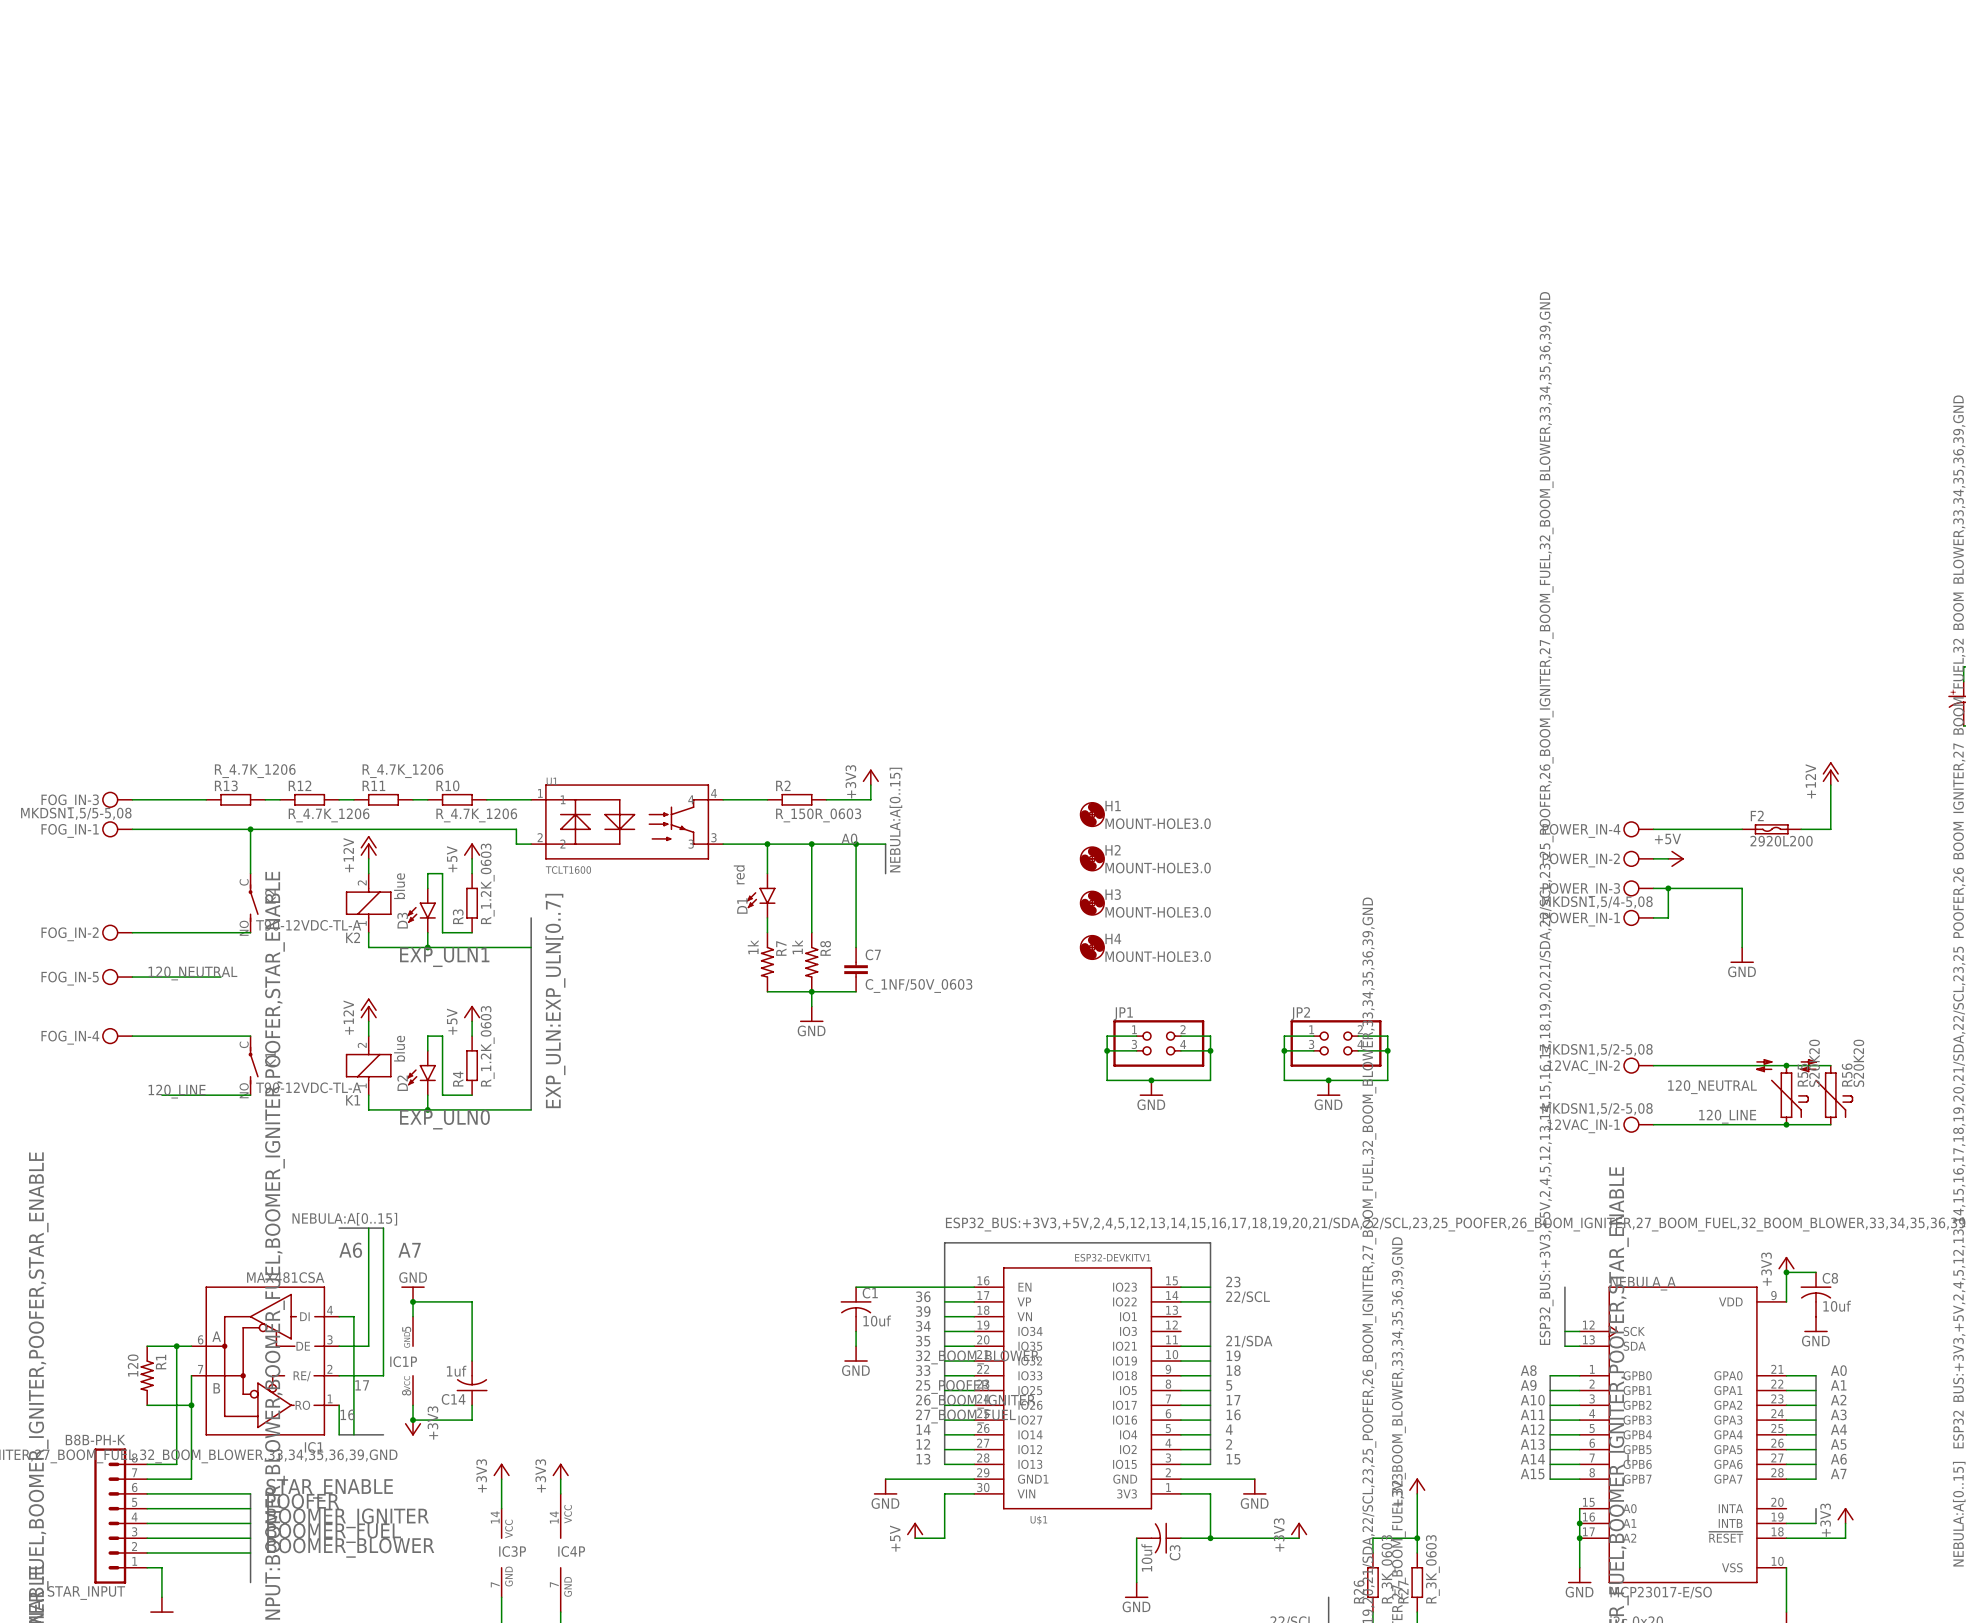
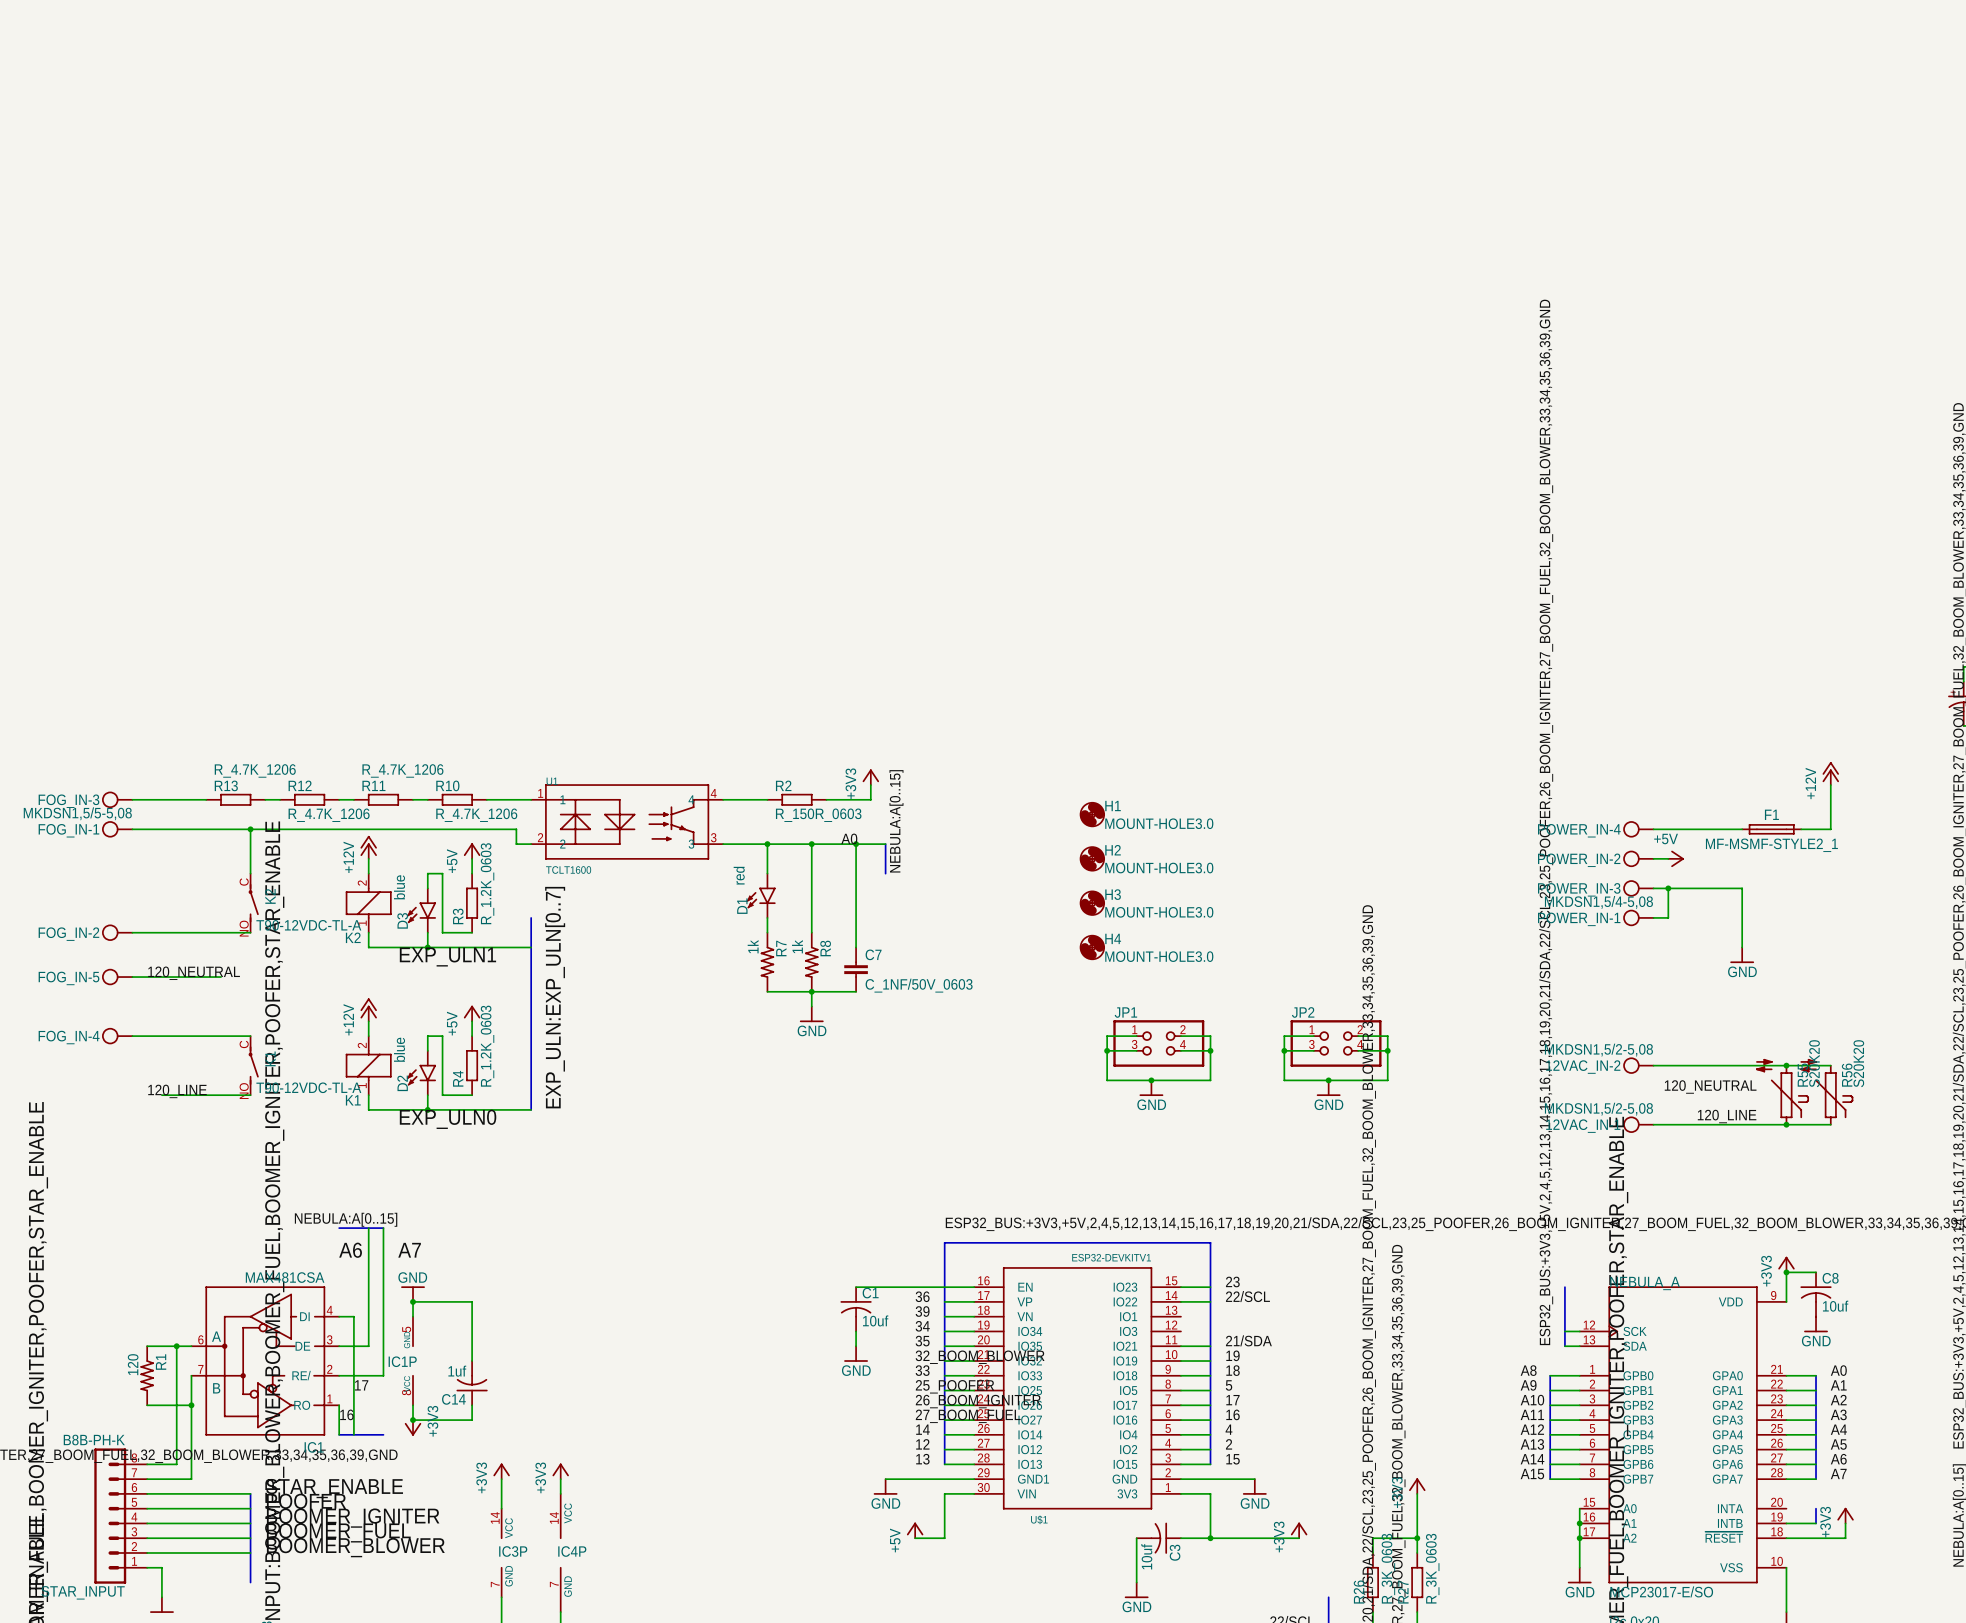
F2: 2920L200 (1771, 829) -> none
F1: none -> MF-MSMF-STYLE2_1 (1771, 829)

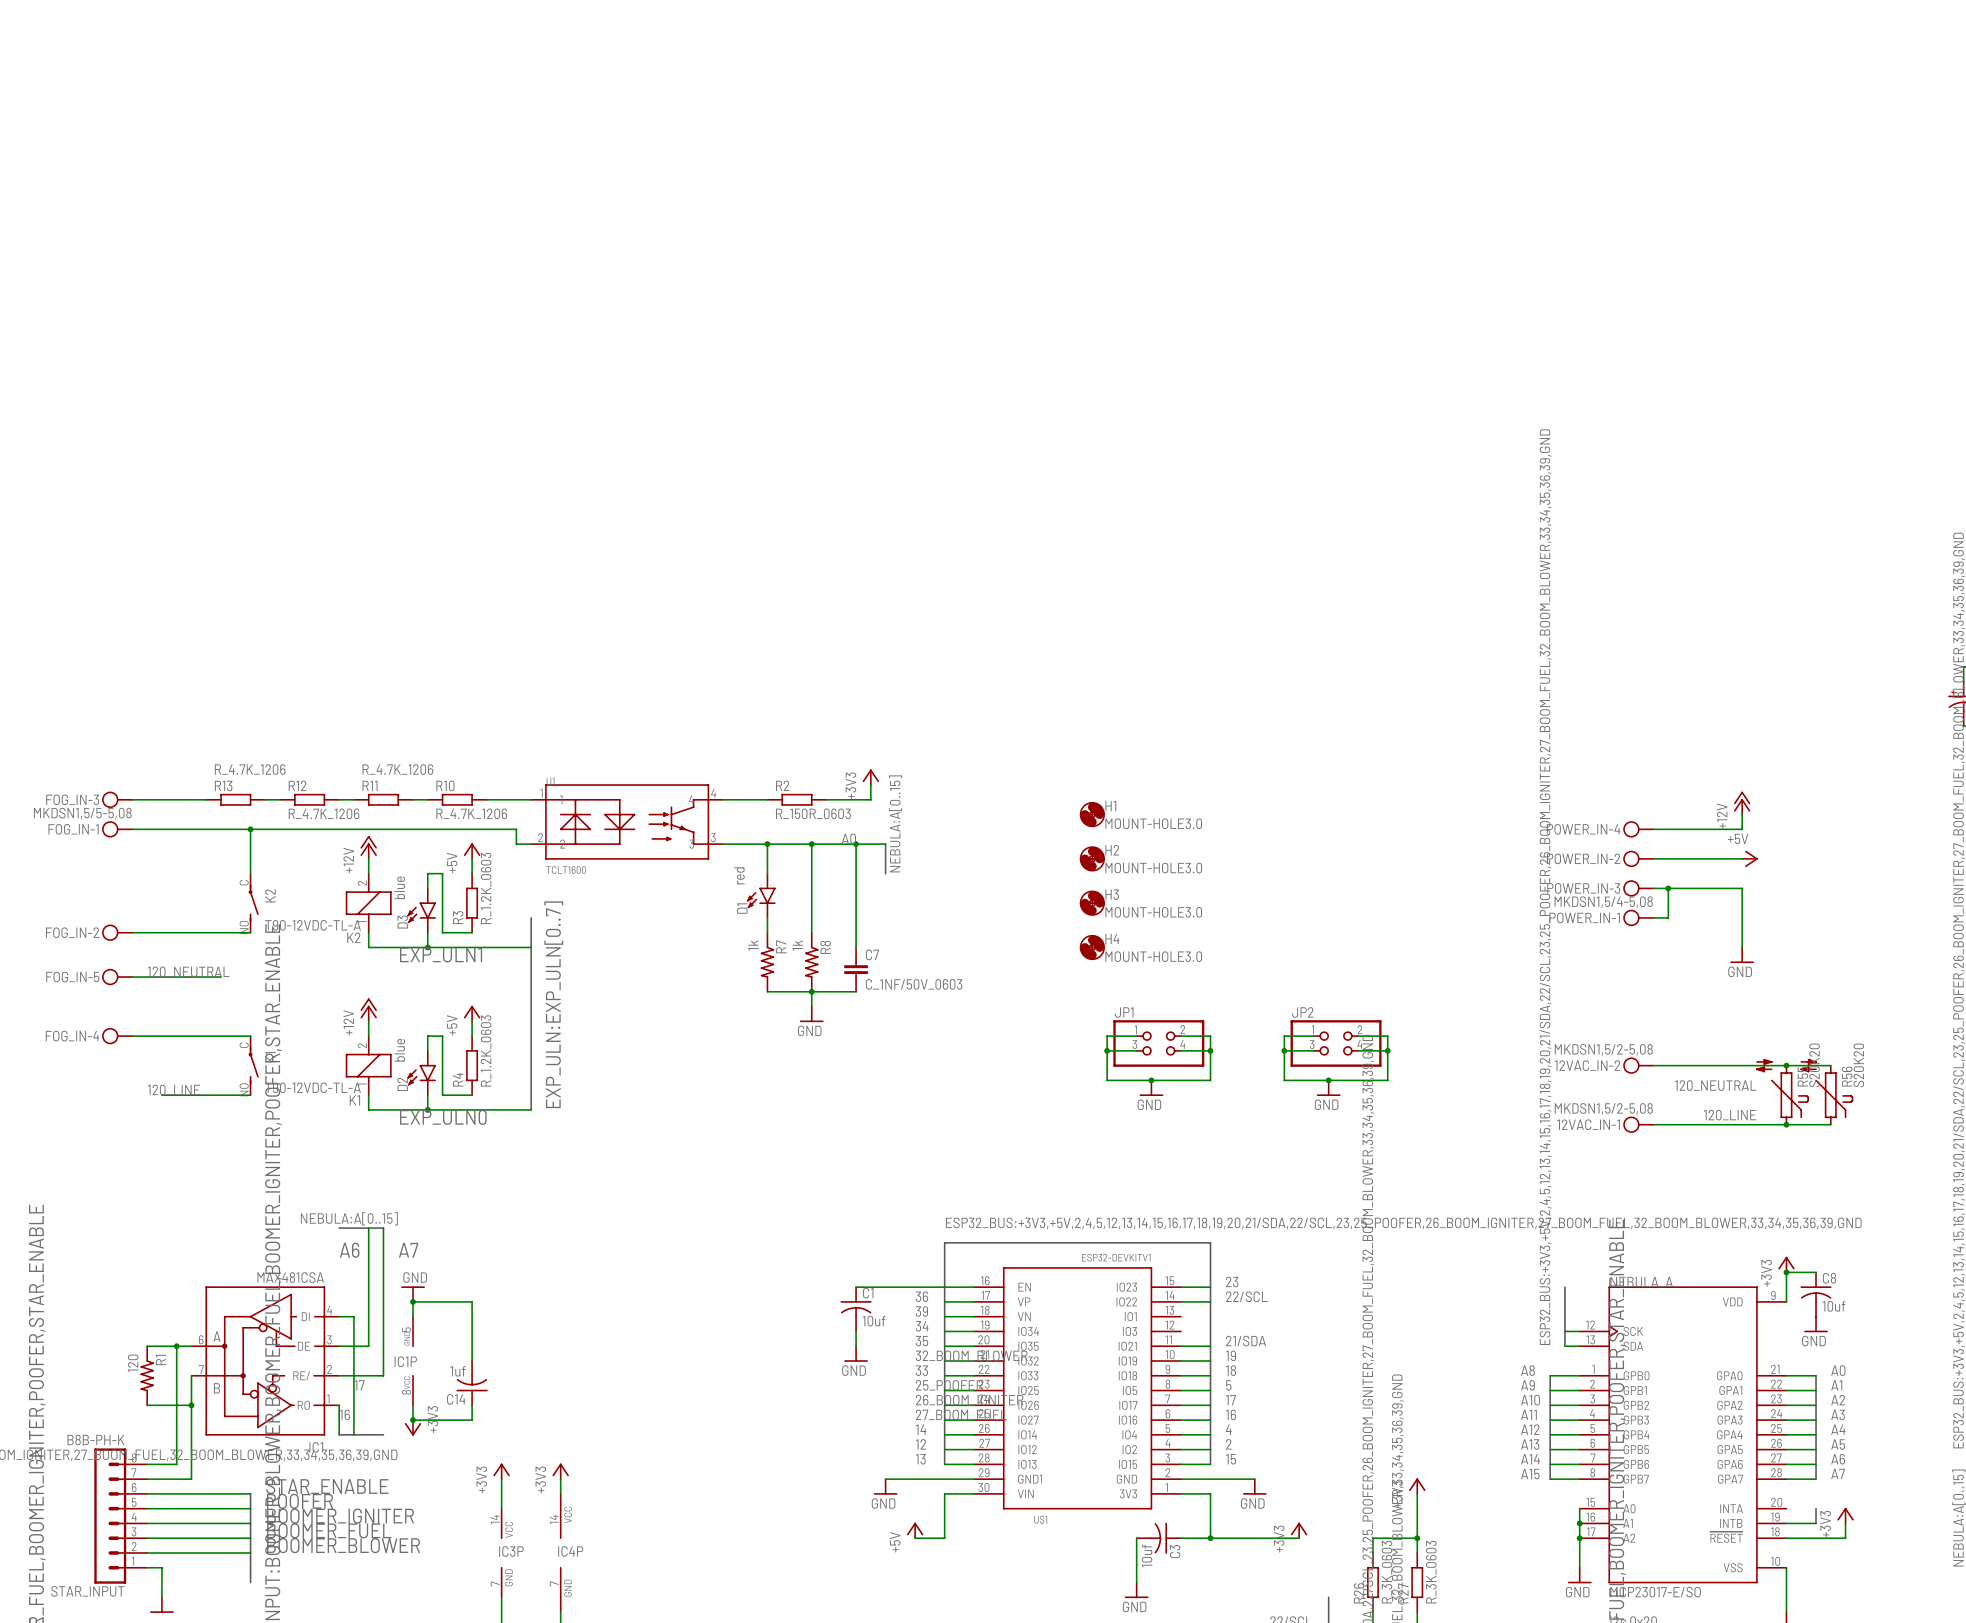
power symbol position: +12V (1830, 773) -> +12V (1742, 803)
wire: (1830, 785) (1830, 829) (1801, 829) -> none
wire: none -> (1742, 814) (1742, 829)
F1: MF-MSMF-STYLE2_1 (1771, 829) -> none
wire: none -> (1668, 858) (1742, 858)
power symbol position: +5V (1676, 858) -> +5V (1749, 858)

